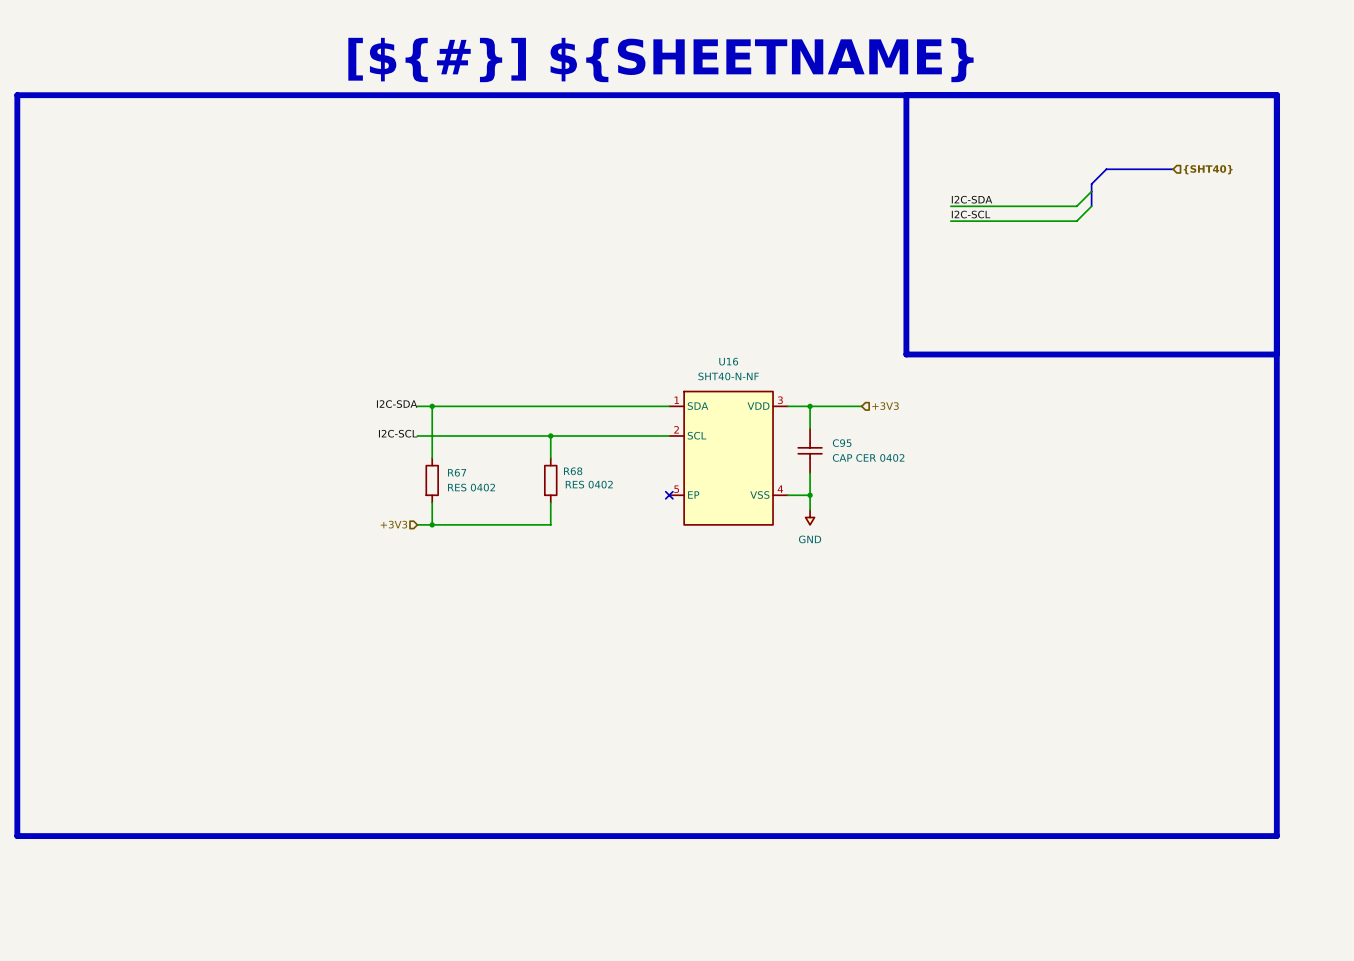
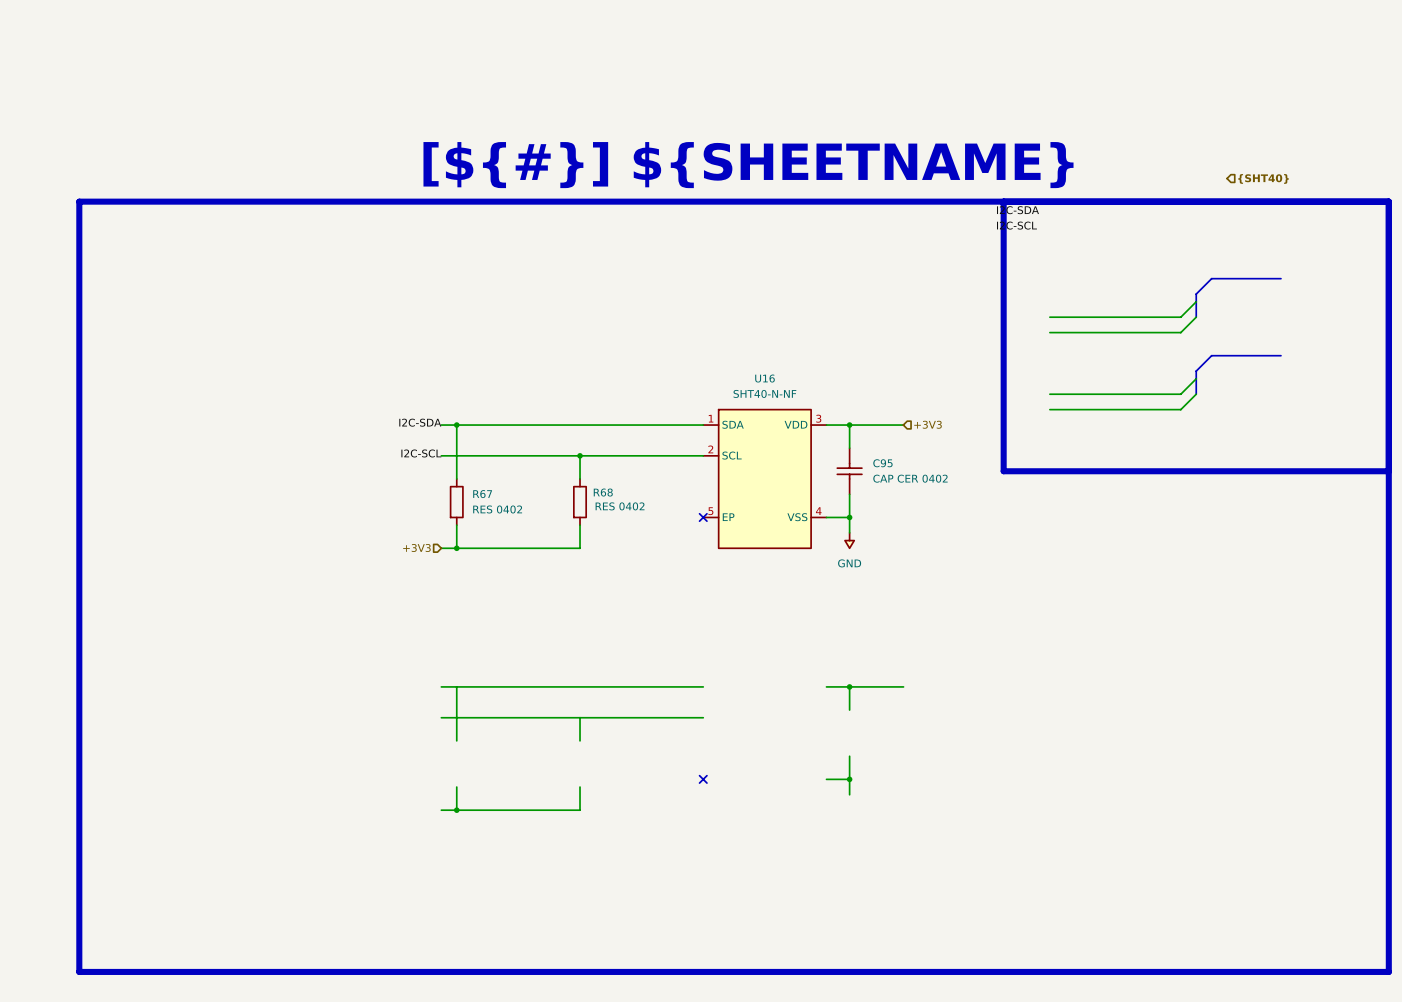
text position: [${#}] ${SHEETNAME} (660, 60) -> [${#}] ${SHEETNAME} (748, 165)
line: (17, 95) (1276, 95) (1276, 836) (17, 836) (17, 95) -> (79, 201) (1388, 201) (1388, 971) (79, 971) (79, 201)
line: (906, 95) (906, 354) (1276, 354) -> (1003, 201) (1003, 471) (1388, 471)
bus: (1173, 169) (1106, 169) (1091, 184) (1091, 206) -> (1280, 278) (1211, 278) (1196, 294) (1196, 317)
wire: (1091, 191) (1076, 206) (950, 206) -> (1196, 301) (1180, 317) (1049, 317)
wire: (1091, 206) (1076, 221) (950, 221) -> (1196, 317) (1180, 332) (1049, 332)
bus: none -> (1280, 355) (1211, 355) (1196, 371) (1196, 394)
wire: none -> (1196, 378) (1180, 394) (1049, 394)
wire: none -> (1196, 394) (1180, 409) (1049, 409)
wire: none -> (441, 686) (703, 686)
wire: none -> (456, 686) (456, 740)
wire: none -> (826, 686) (903, 686)
wire: none -> (849, 686) (849, 710)
junction: none -> (849, 686)
wire: none -> (441, 717) (703, 717)
wire: none -> (580, 717) (580, 740)
wire: none -> (849, 756) (849, 794)
no-connect mark: none -> (703, 779)
wire: none -> (826, 779) (849, 779)
junction: none -> (849, 779)
wire: none -> (456, 787) (456, 810)
wire: none -> (580, 787) (580, 810) (441, 810)
junction: none -> (456, 810)

